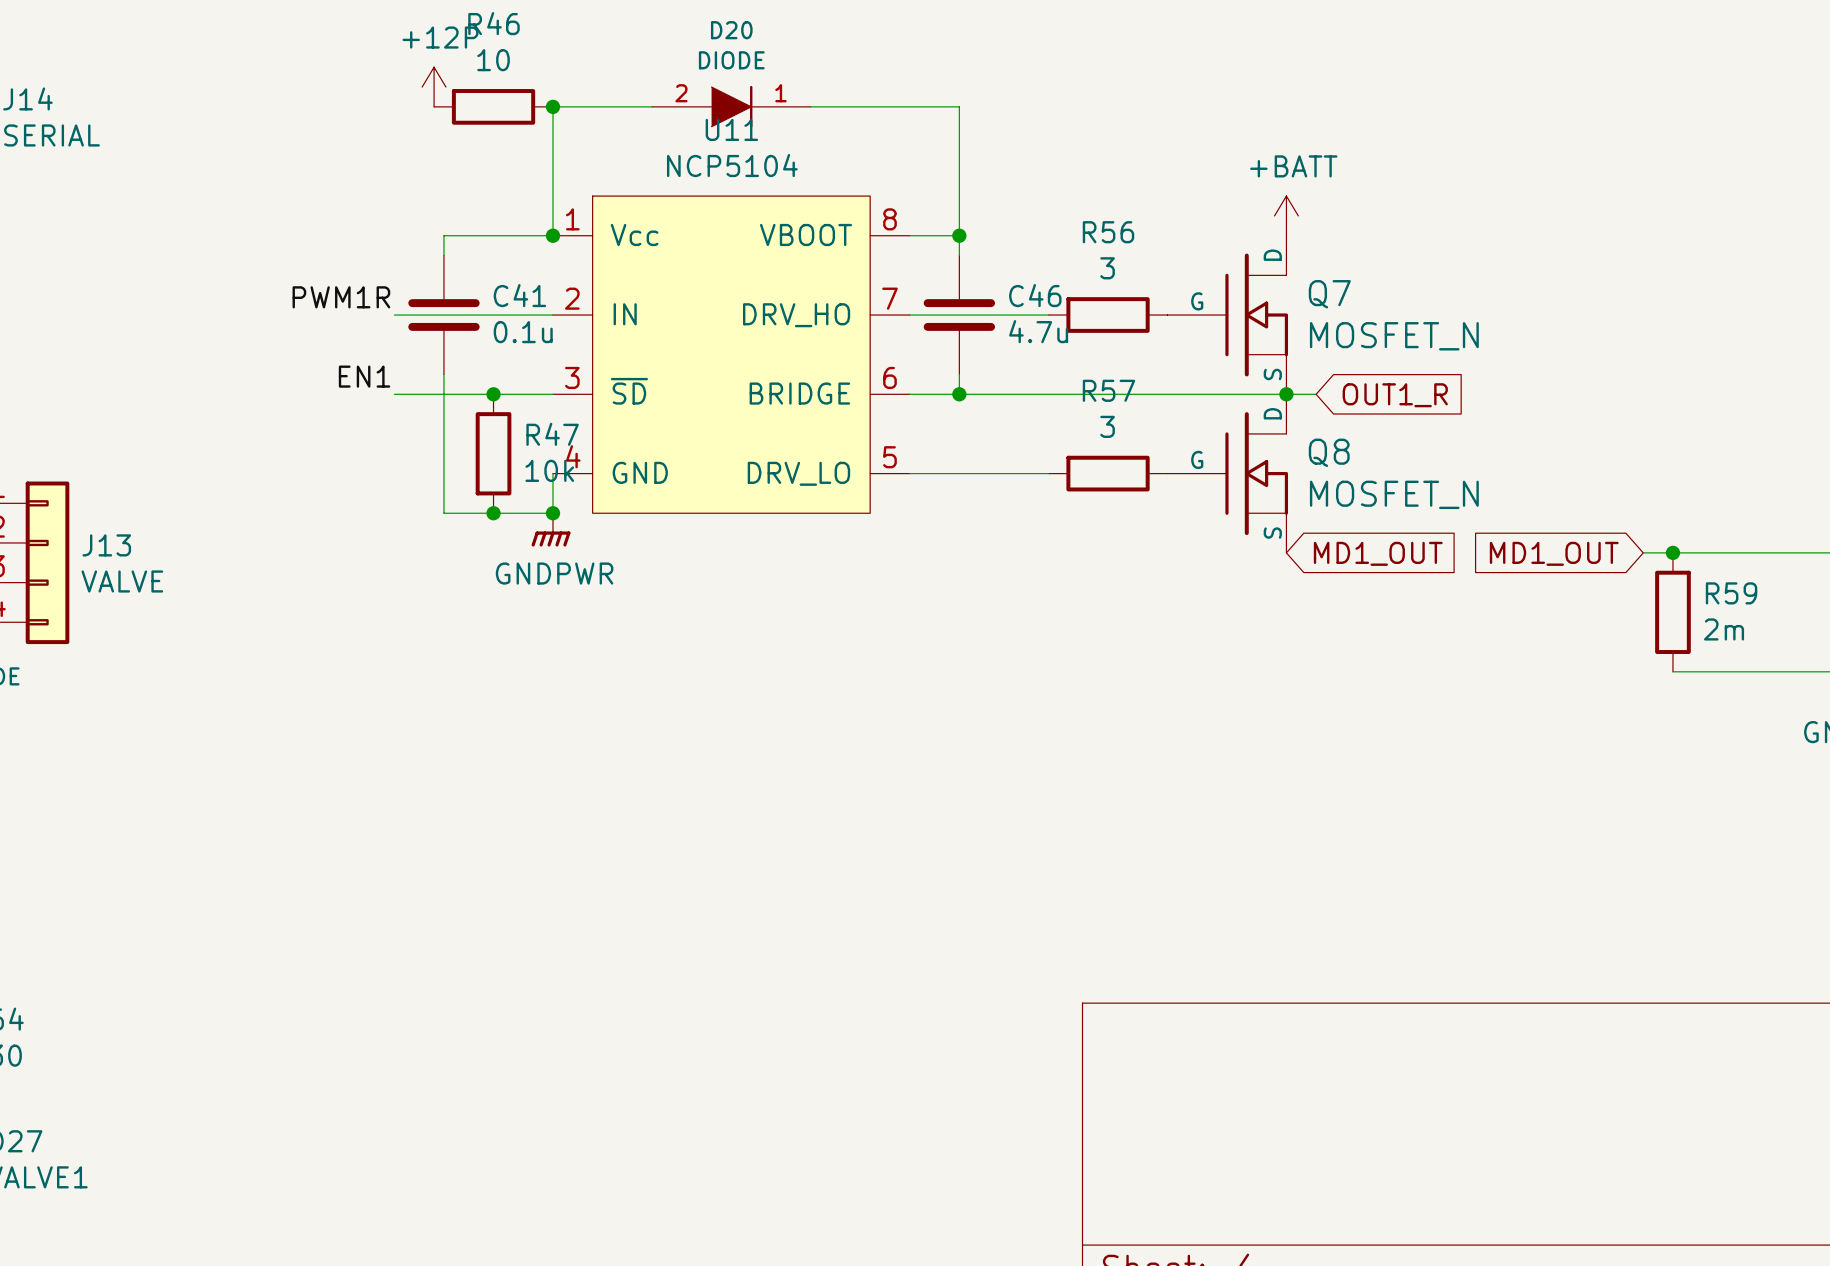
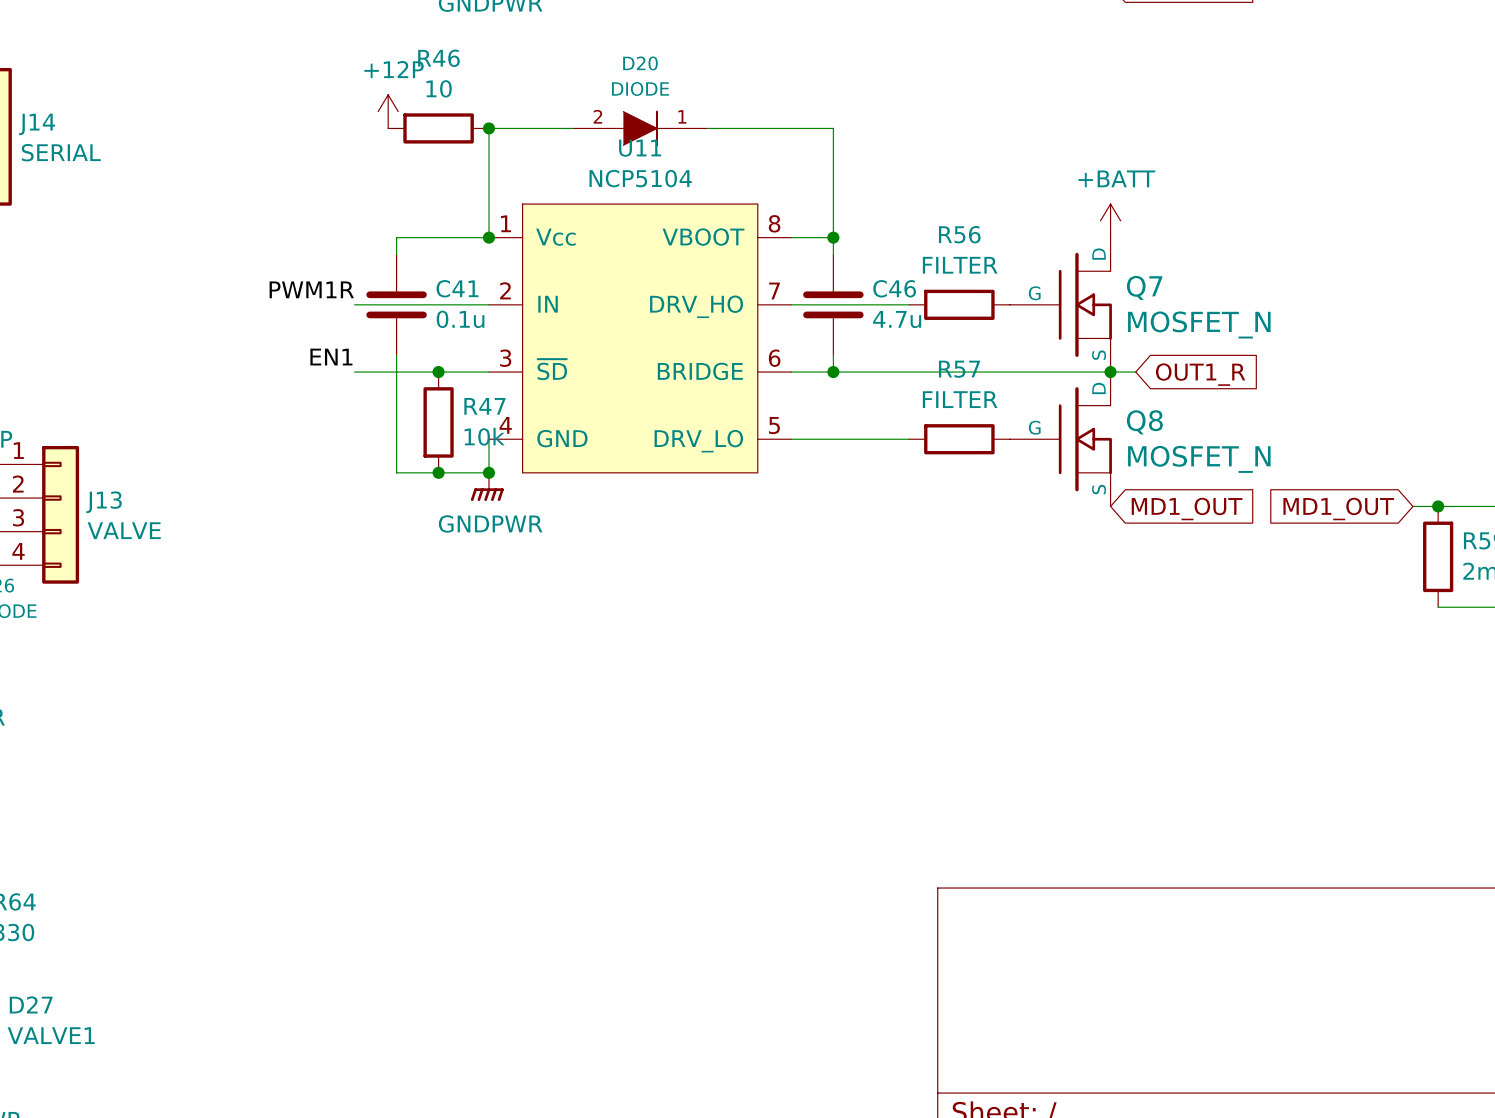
R56 value: 3 (1107, 268) -> FILTER (960, 265)
R57 value: 3 (1107, 426) -> FILTER (960, 399)

